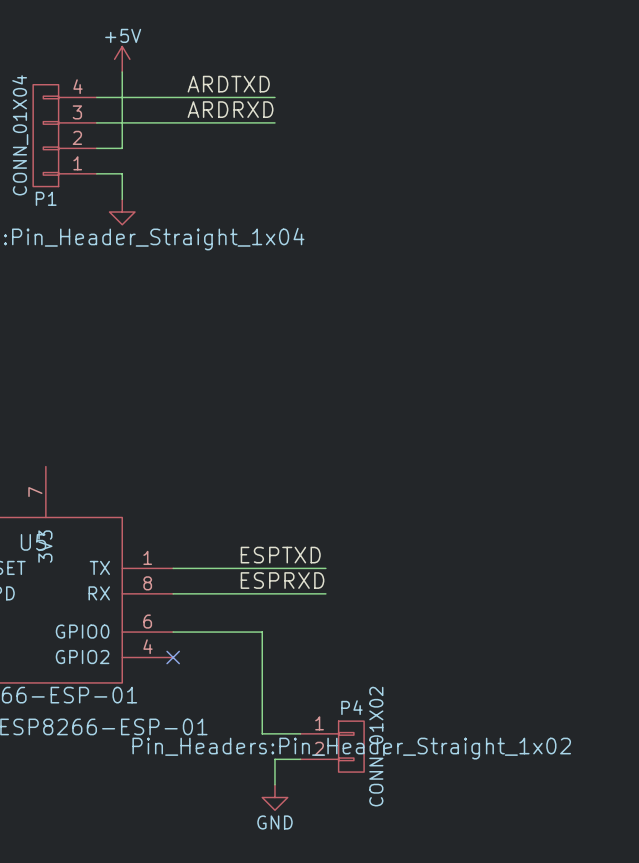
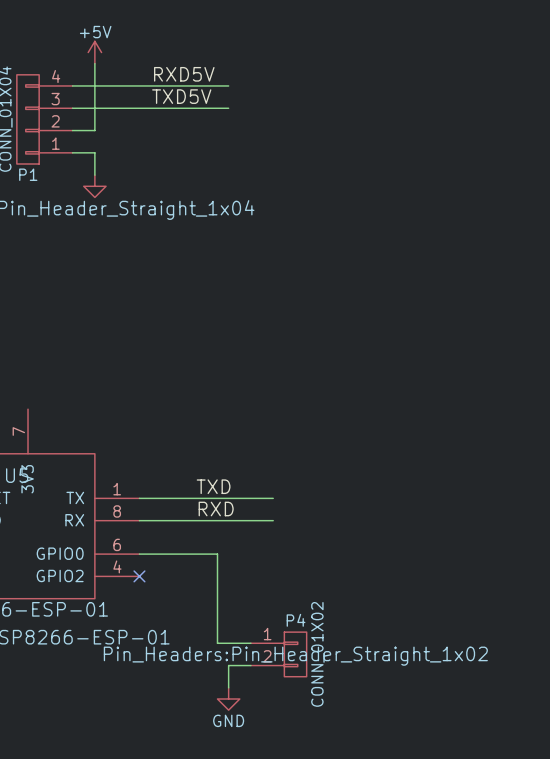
label: ARDTXD (228, 84) -> RXD5V (184, 74)
label: ARDRXD (230, 109) -> TXD5V (181, 96)
label: ESPTXD (280, 555) -> TXD (213, 486)
label: ESPRXD (282, 580) -> RXD (216, 509)

